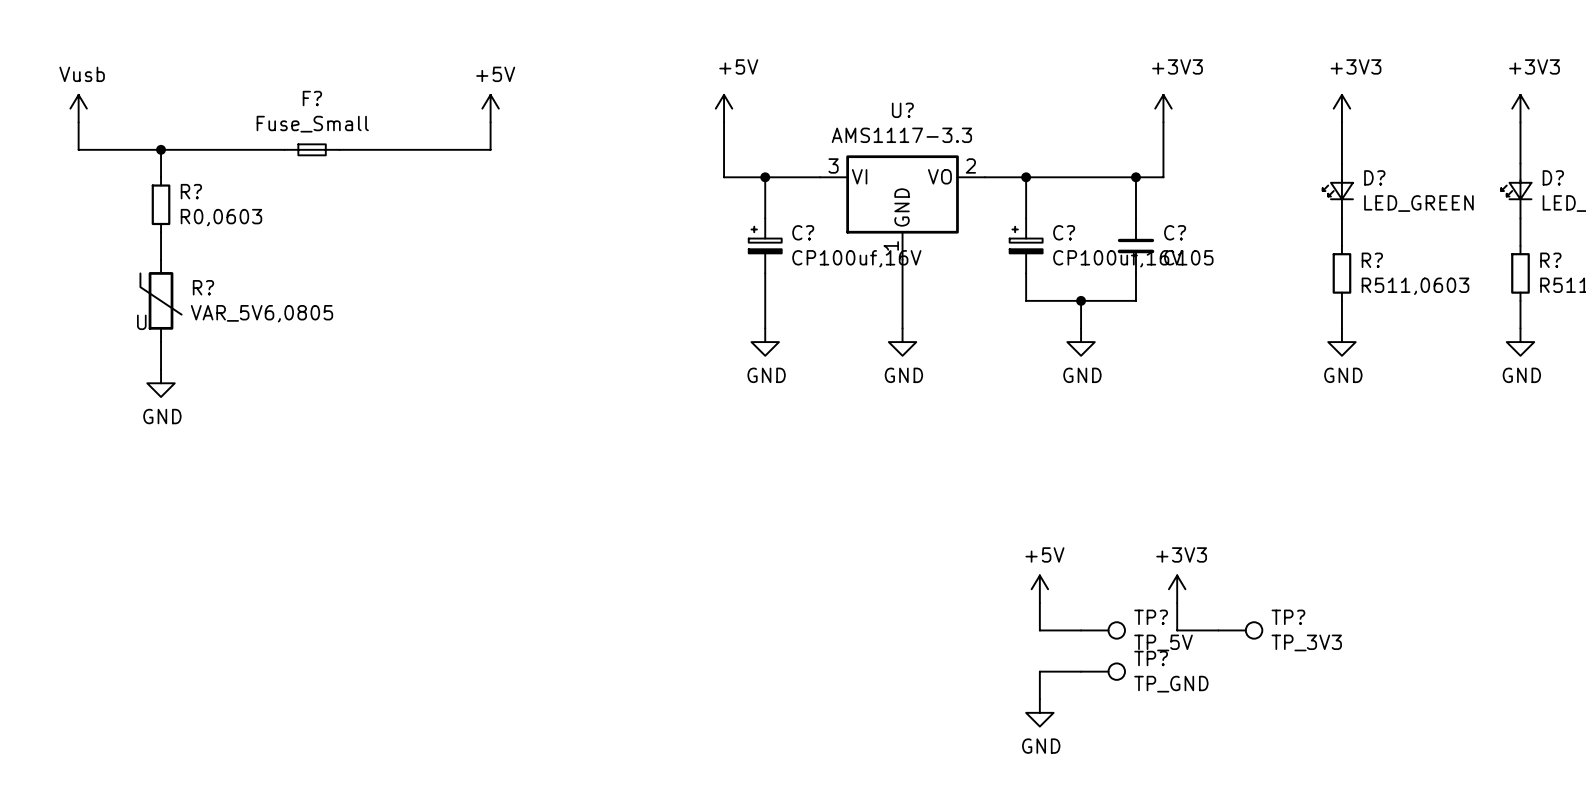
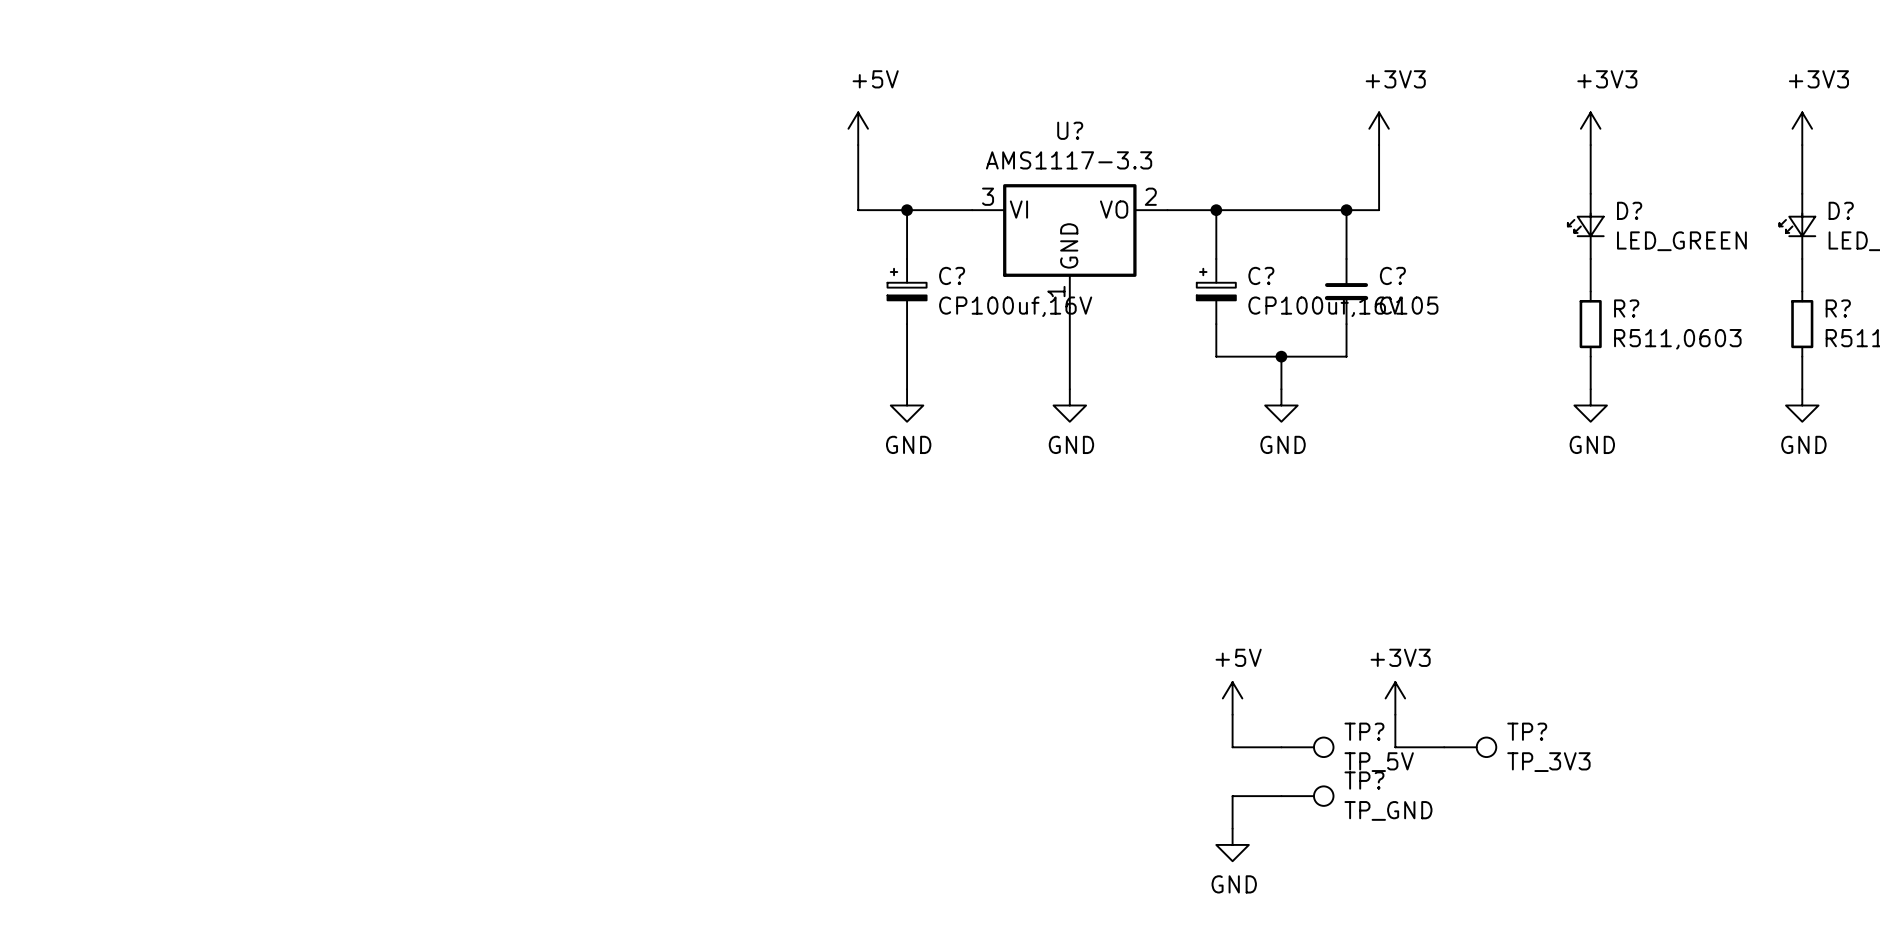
power symbol: Vusb (78, 108) -> none
power symbol: +5V (490, 108) -> none
wire: (78, 122) (78, 149) (284, 149) -> none
wire: (490, 122) (490, 149) (339, 149) -> none
wire: (161, 149) (161, 177) -> none
junction: (161, 149) -> none
F?: Fuse_Small (312, 149) -> none
R?: R0,0603 (161, 204) -> none
wire: (161, 232) (161, 259) -> none
R?: VAR_5V6,0805 (161, 300) -> none
wire: (161, 342) (161, 369) -> none
power symbol: GND (161, 383) -> none

